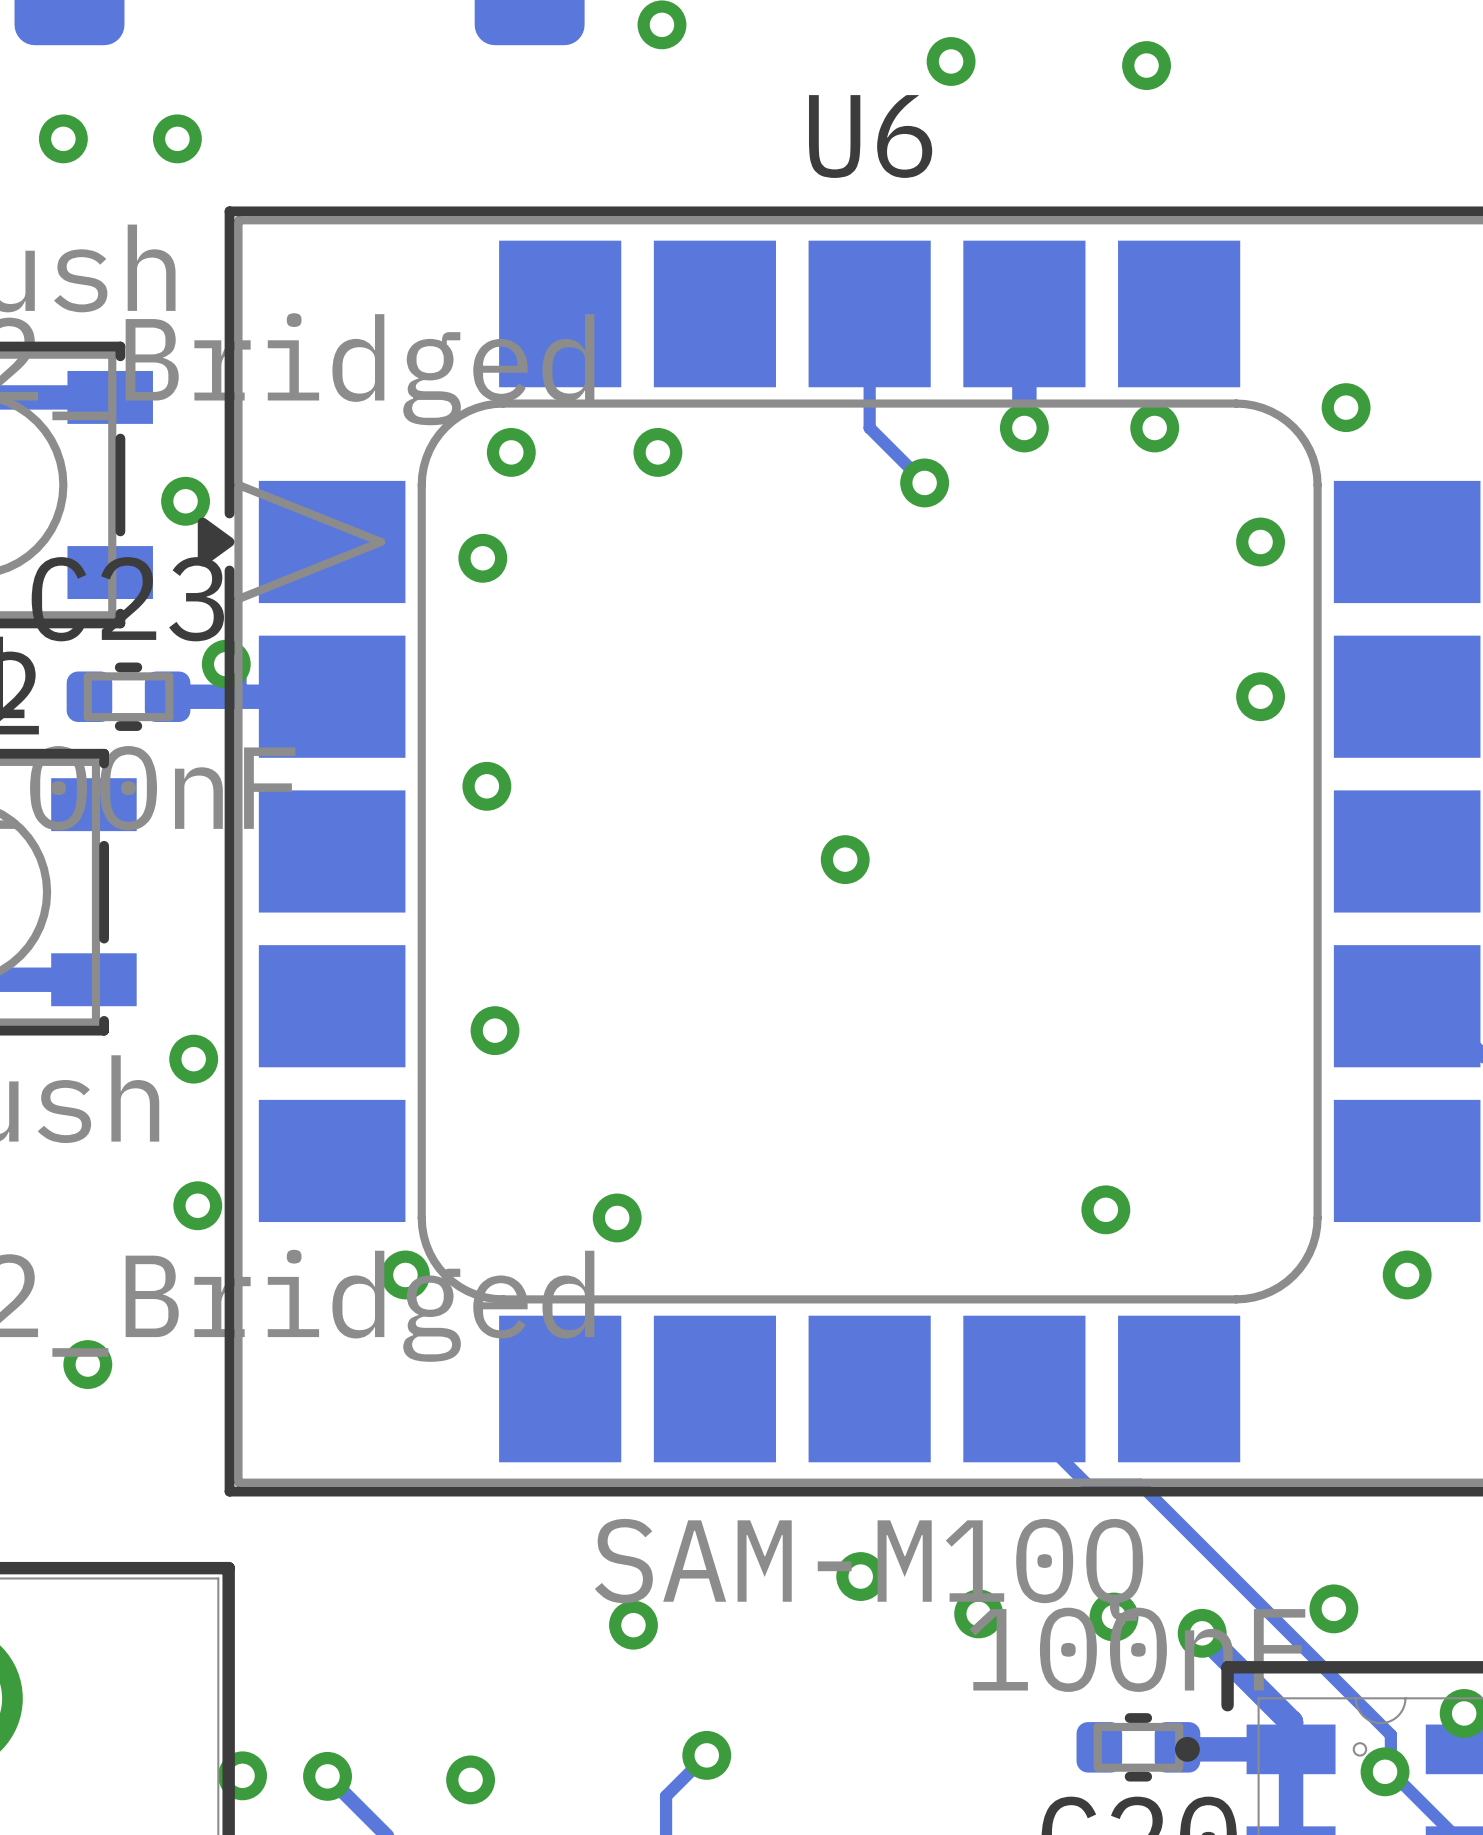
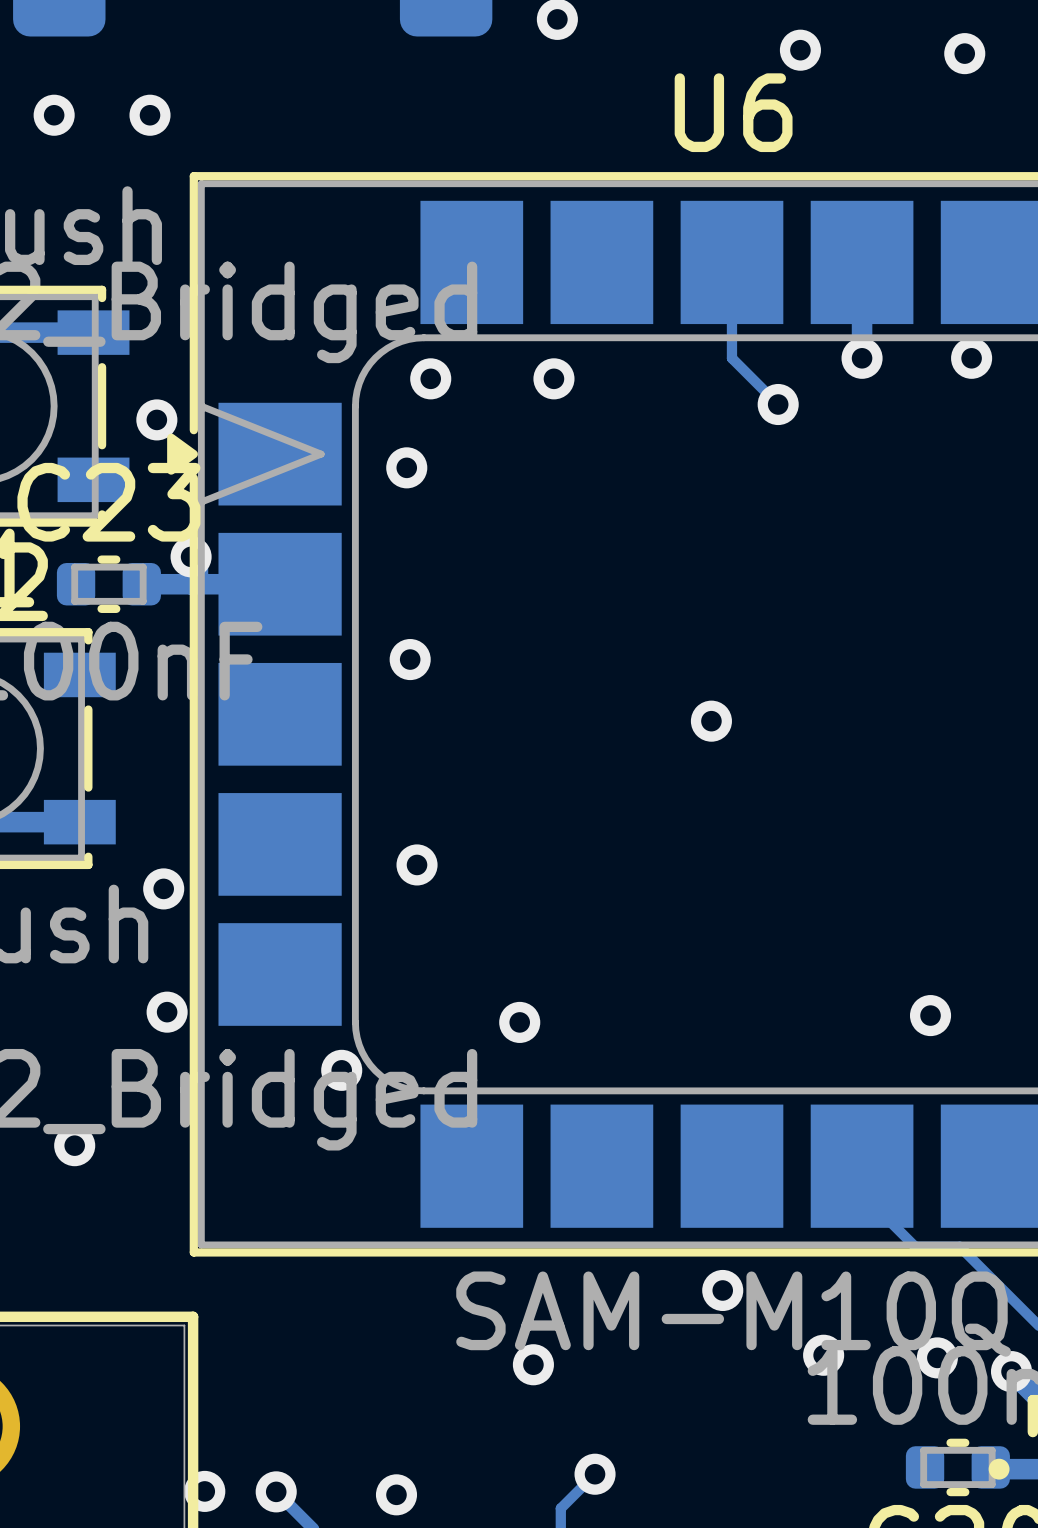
via position: (860, 1576) -> (722, 1290)

